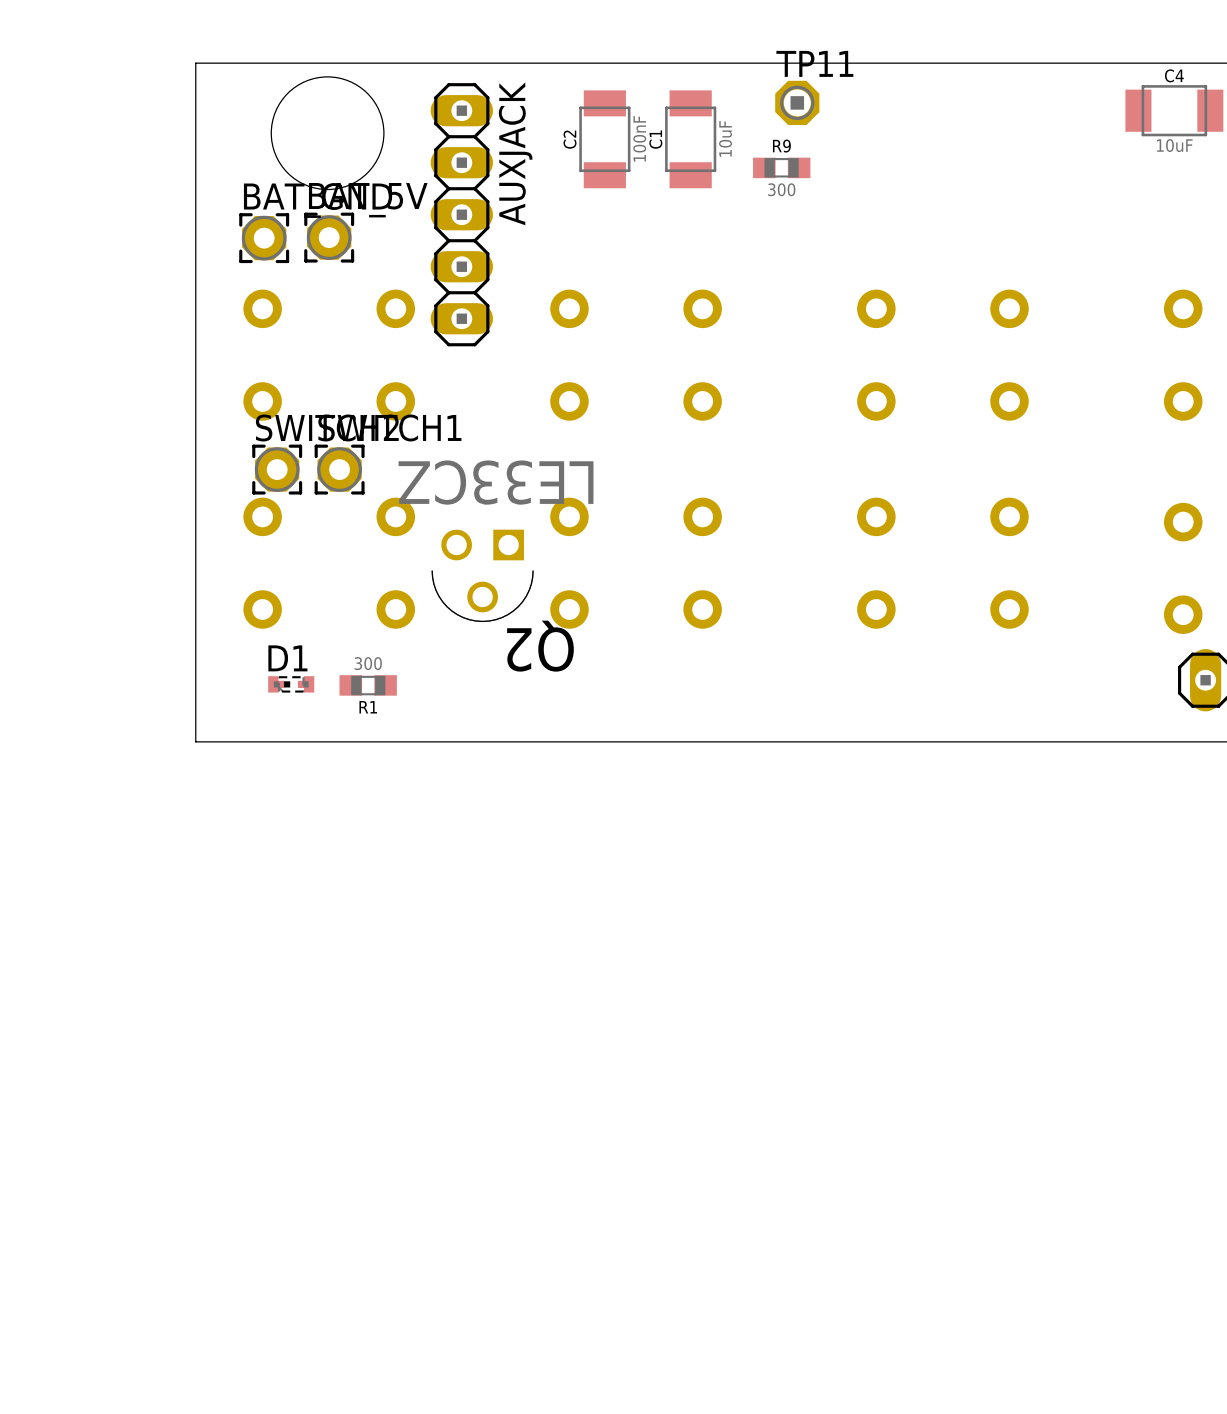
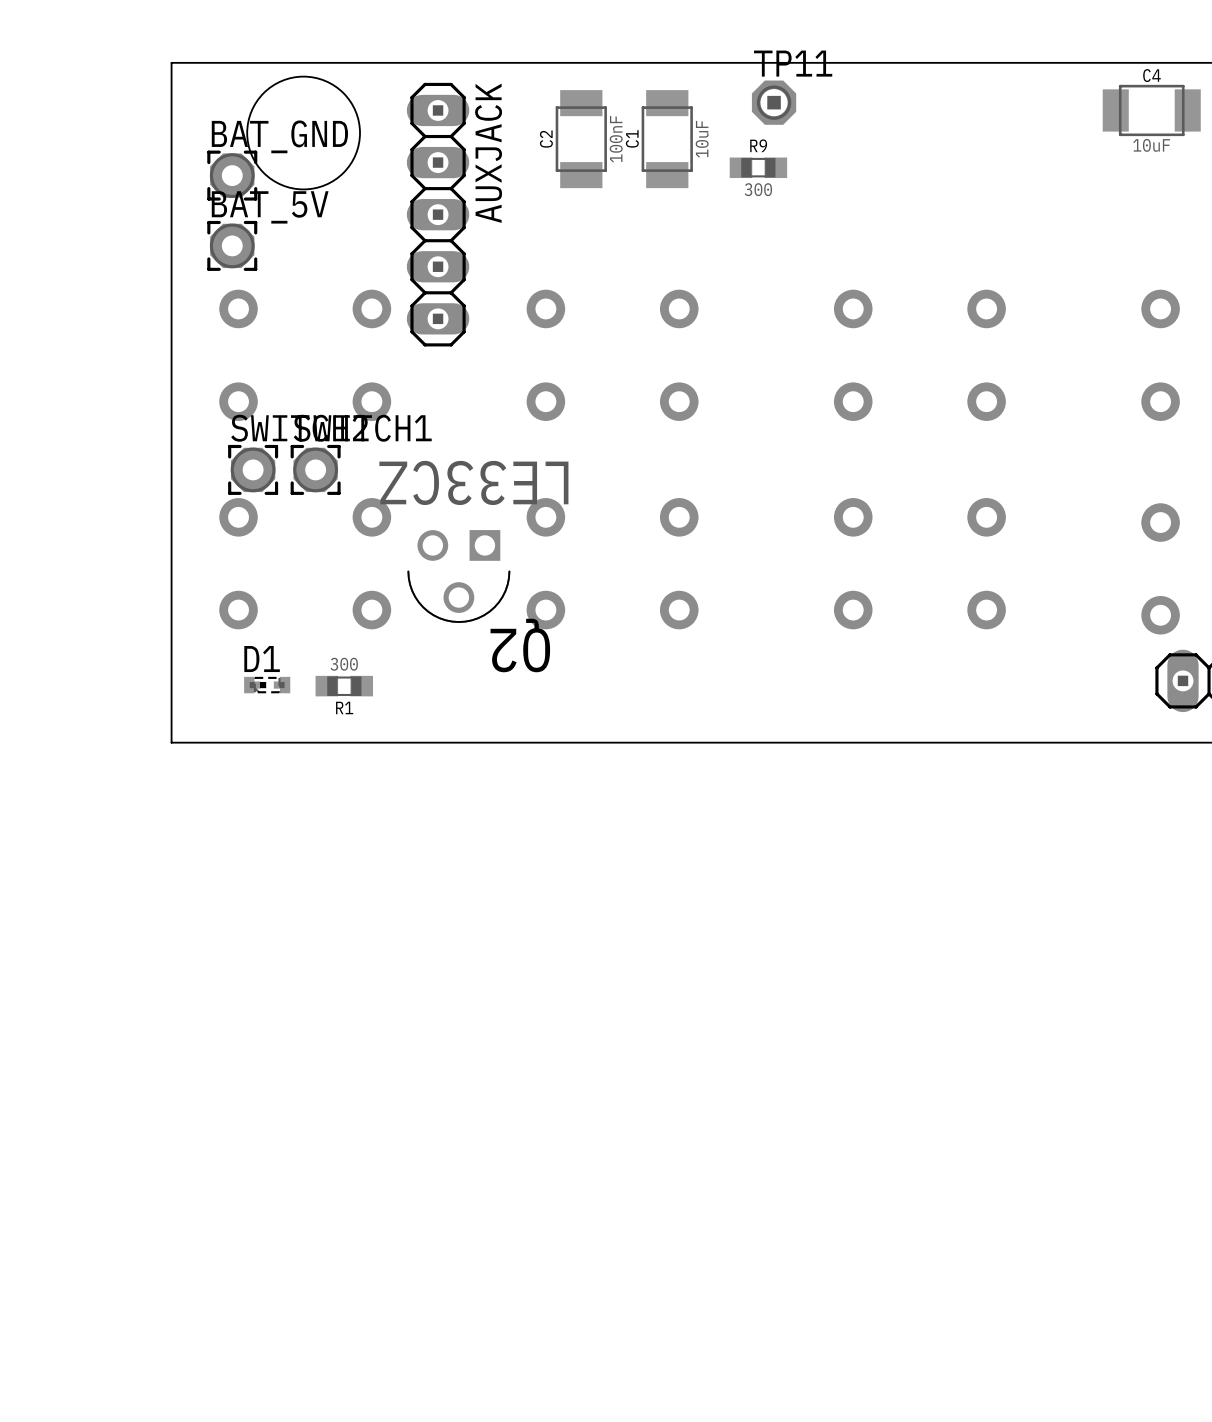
BAT_5V position: (329, 237) -> (232, 245)
BAT_GND position: (264, 238) -> (232, 175)

